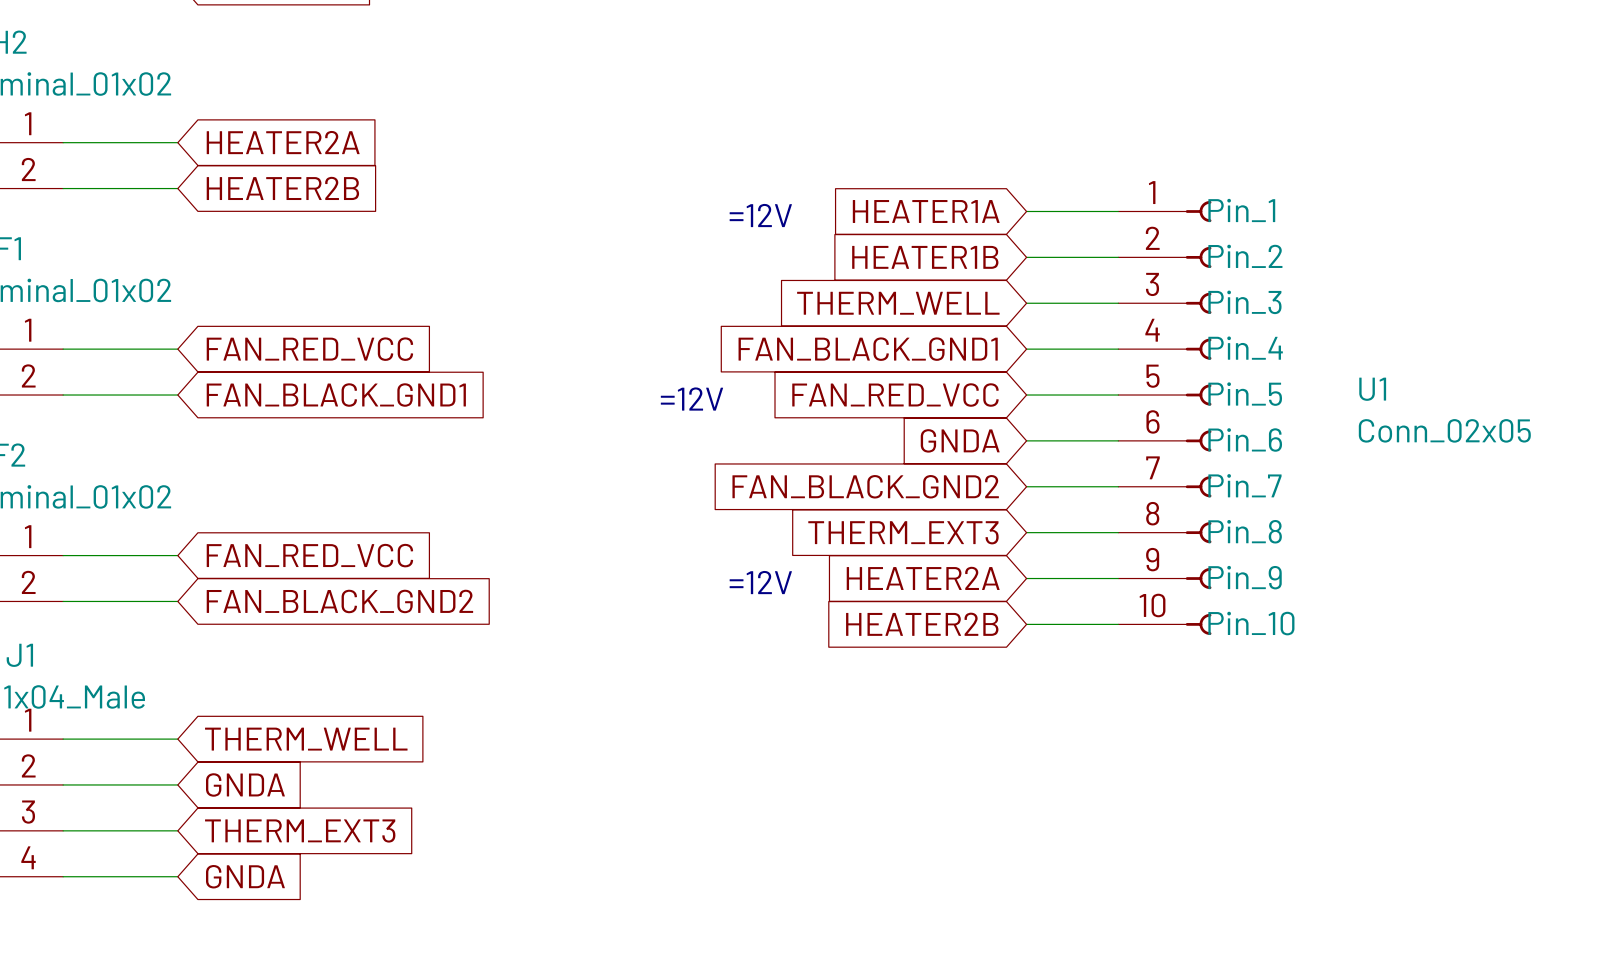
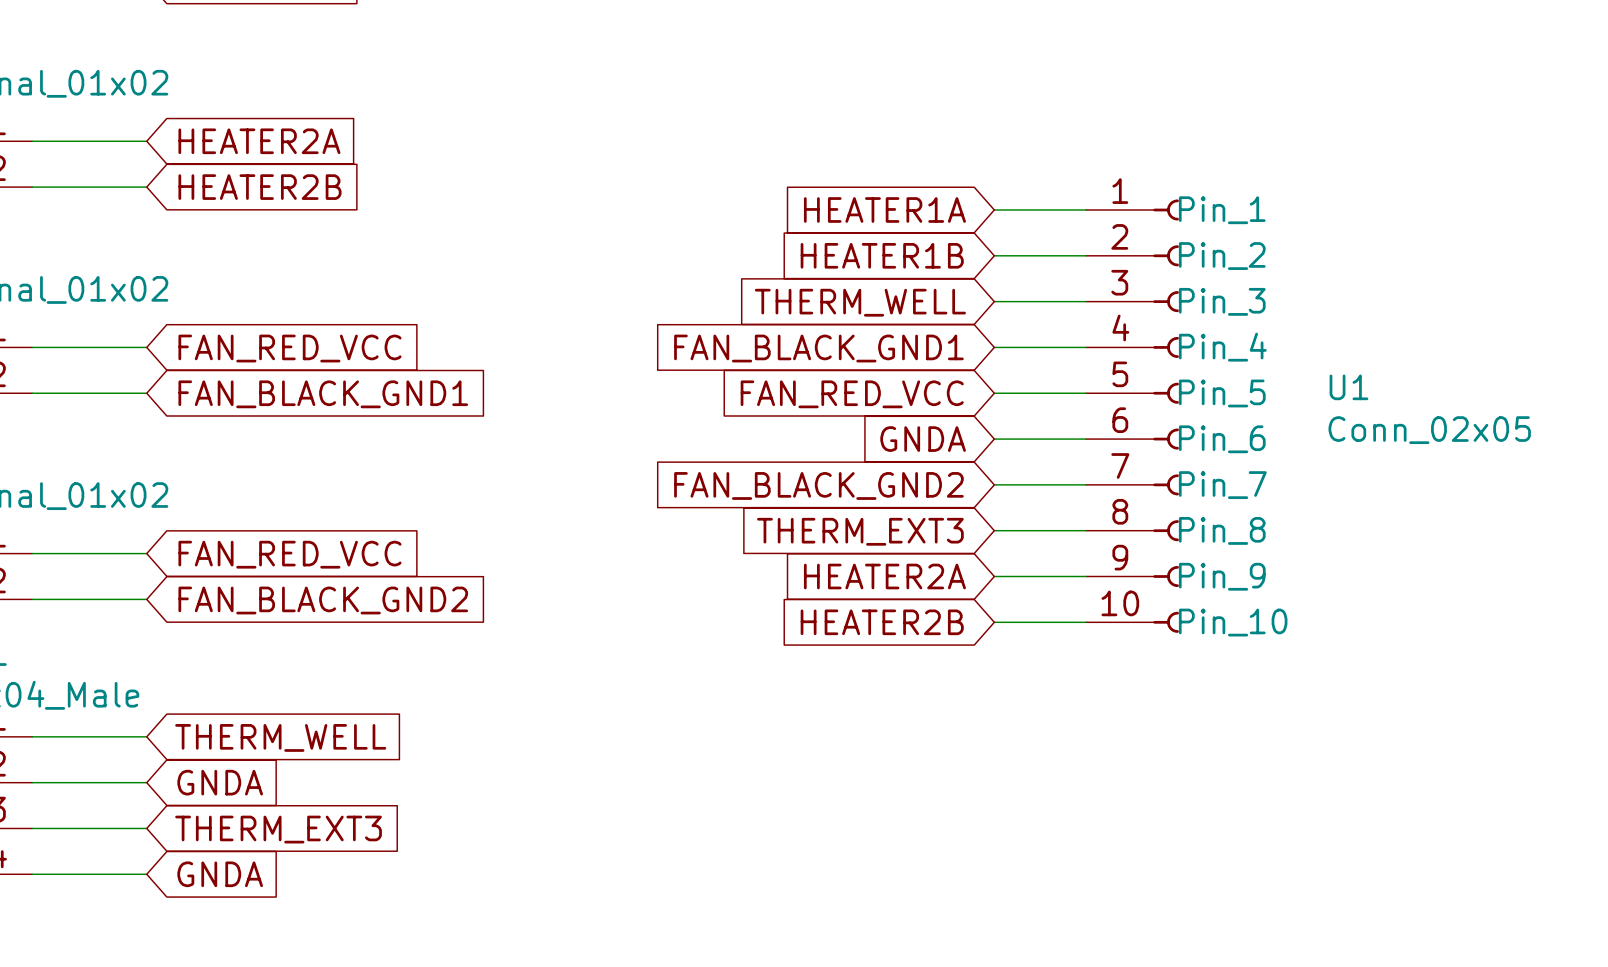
text: =12V (760, 215) -> none
text: =12V (692, 399) -> none
text: =12V (760, 582) -> none

